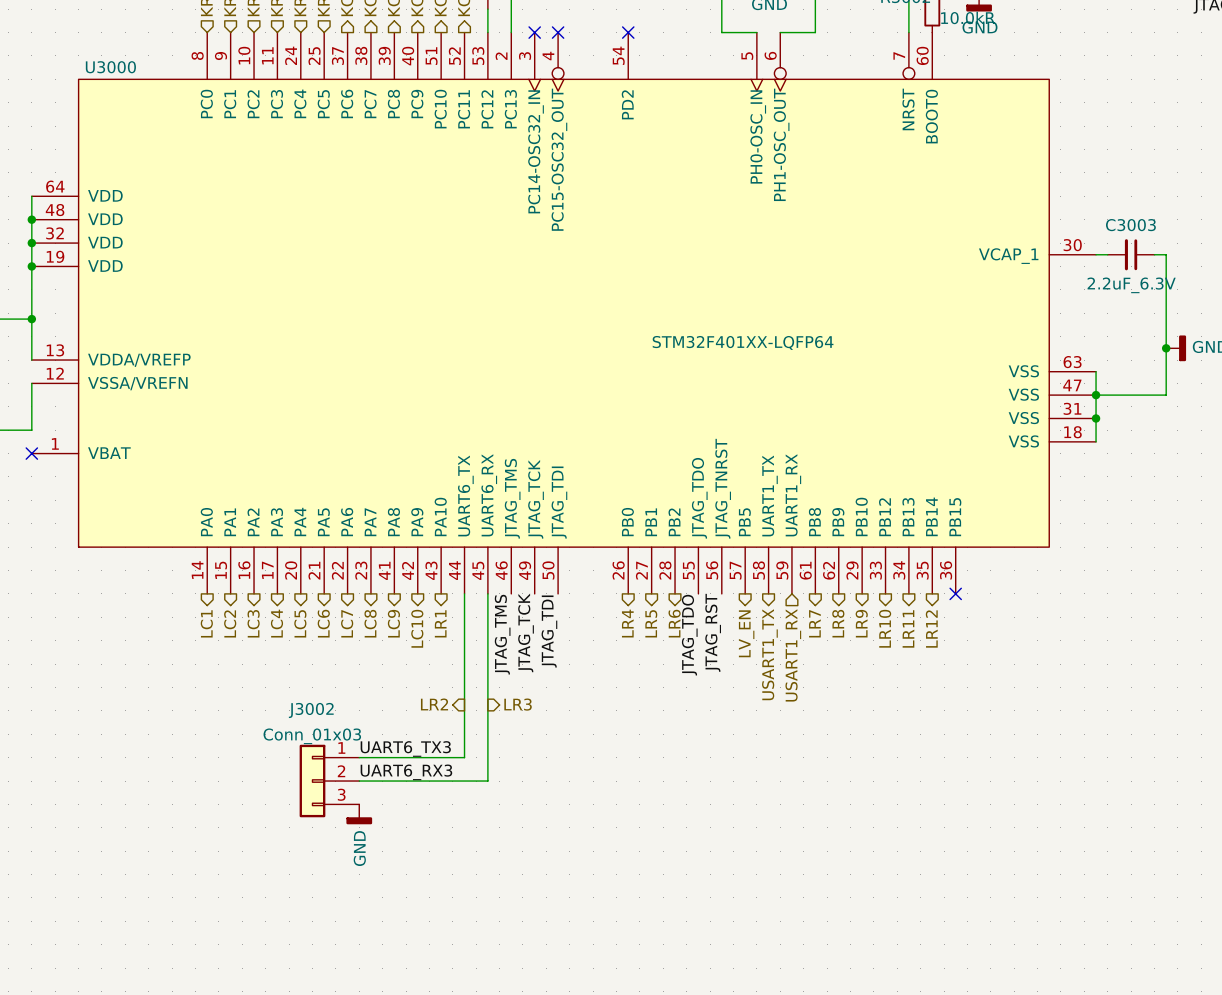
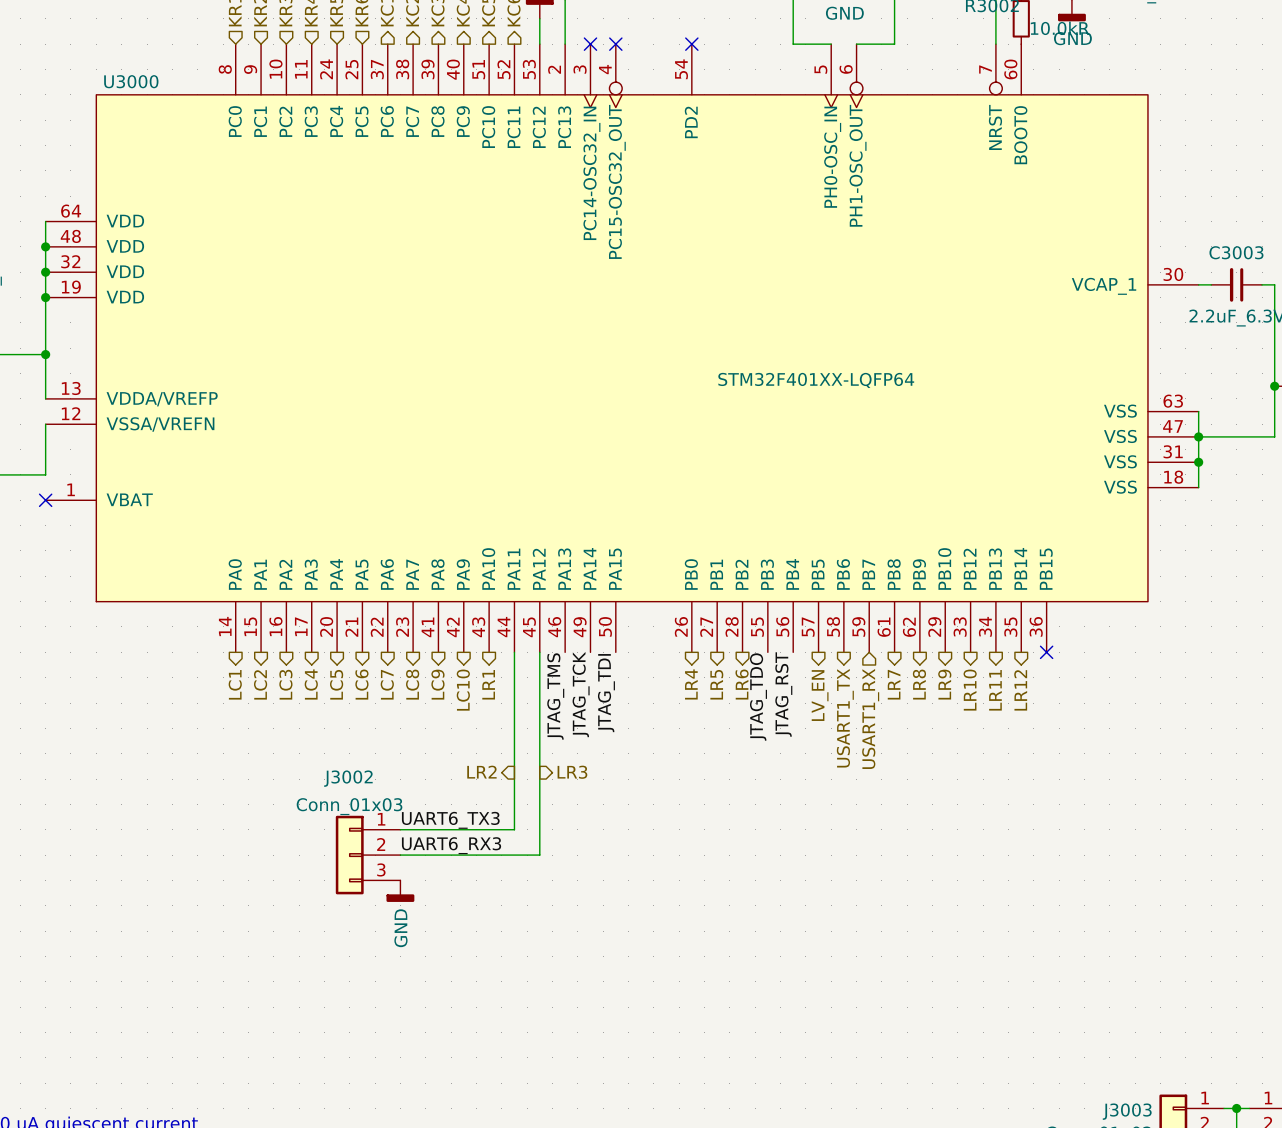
U3000 symbol: [31, 32, 1097, 594] -> [45, 44, 1199, 653]

